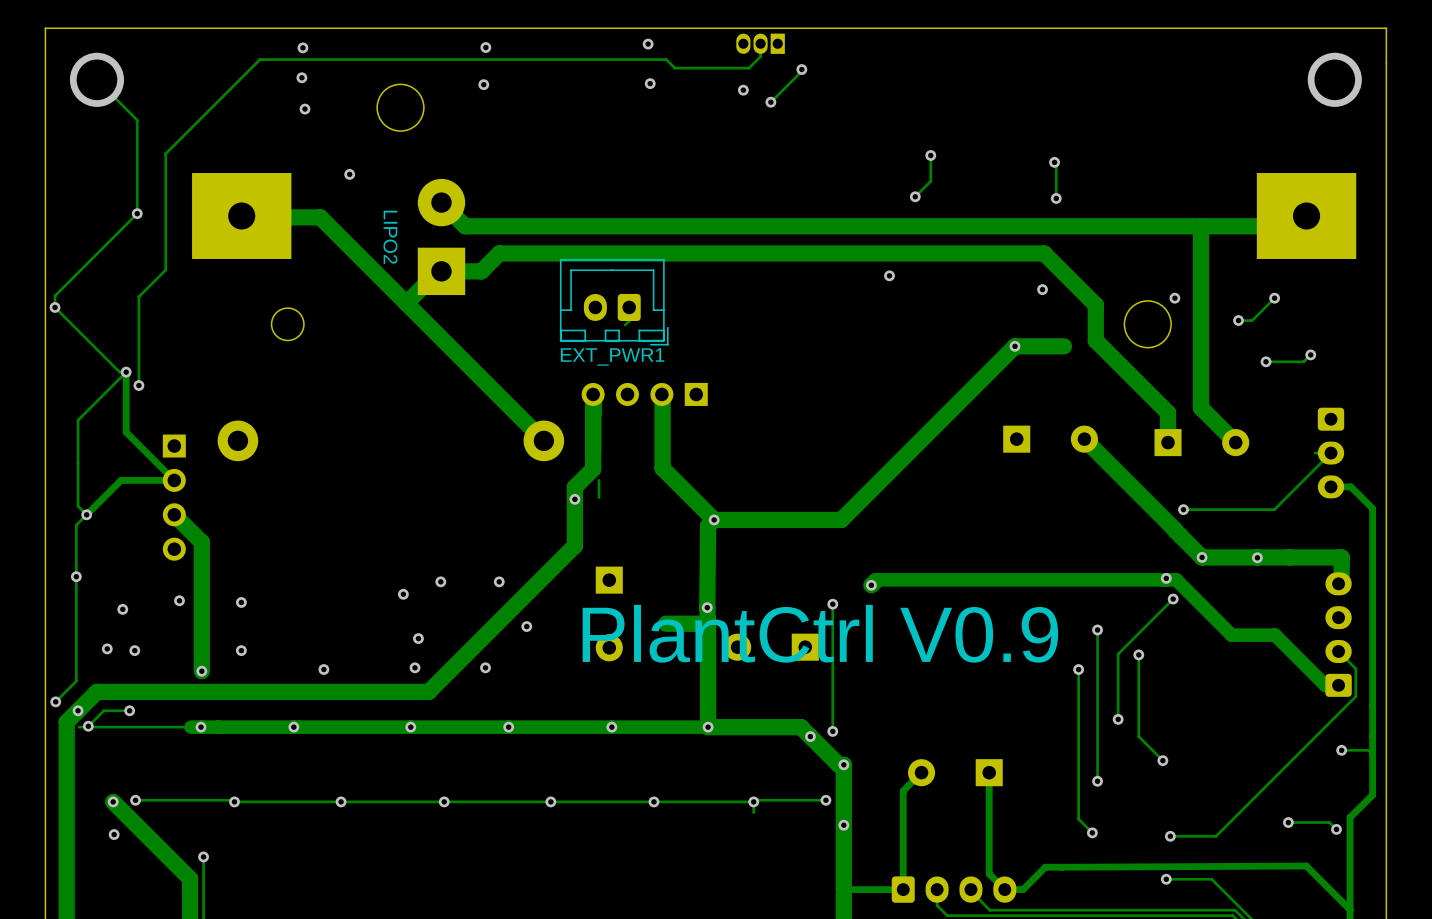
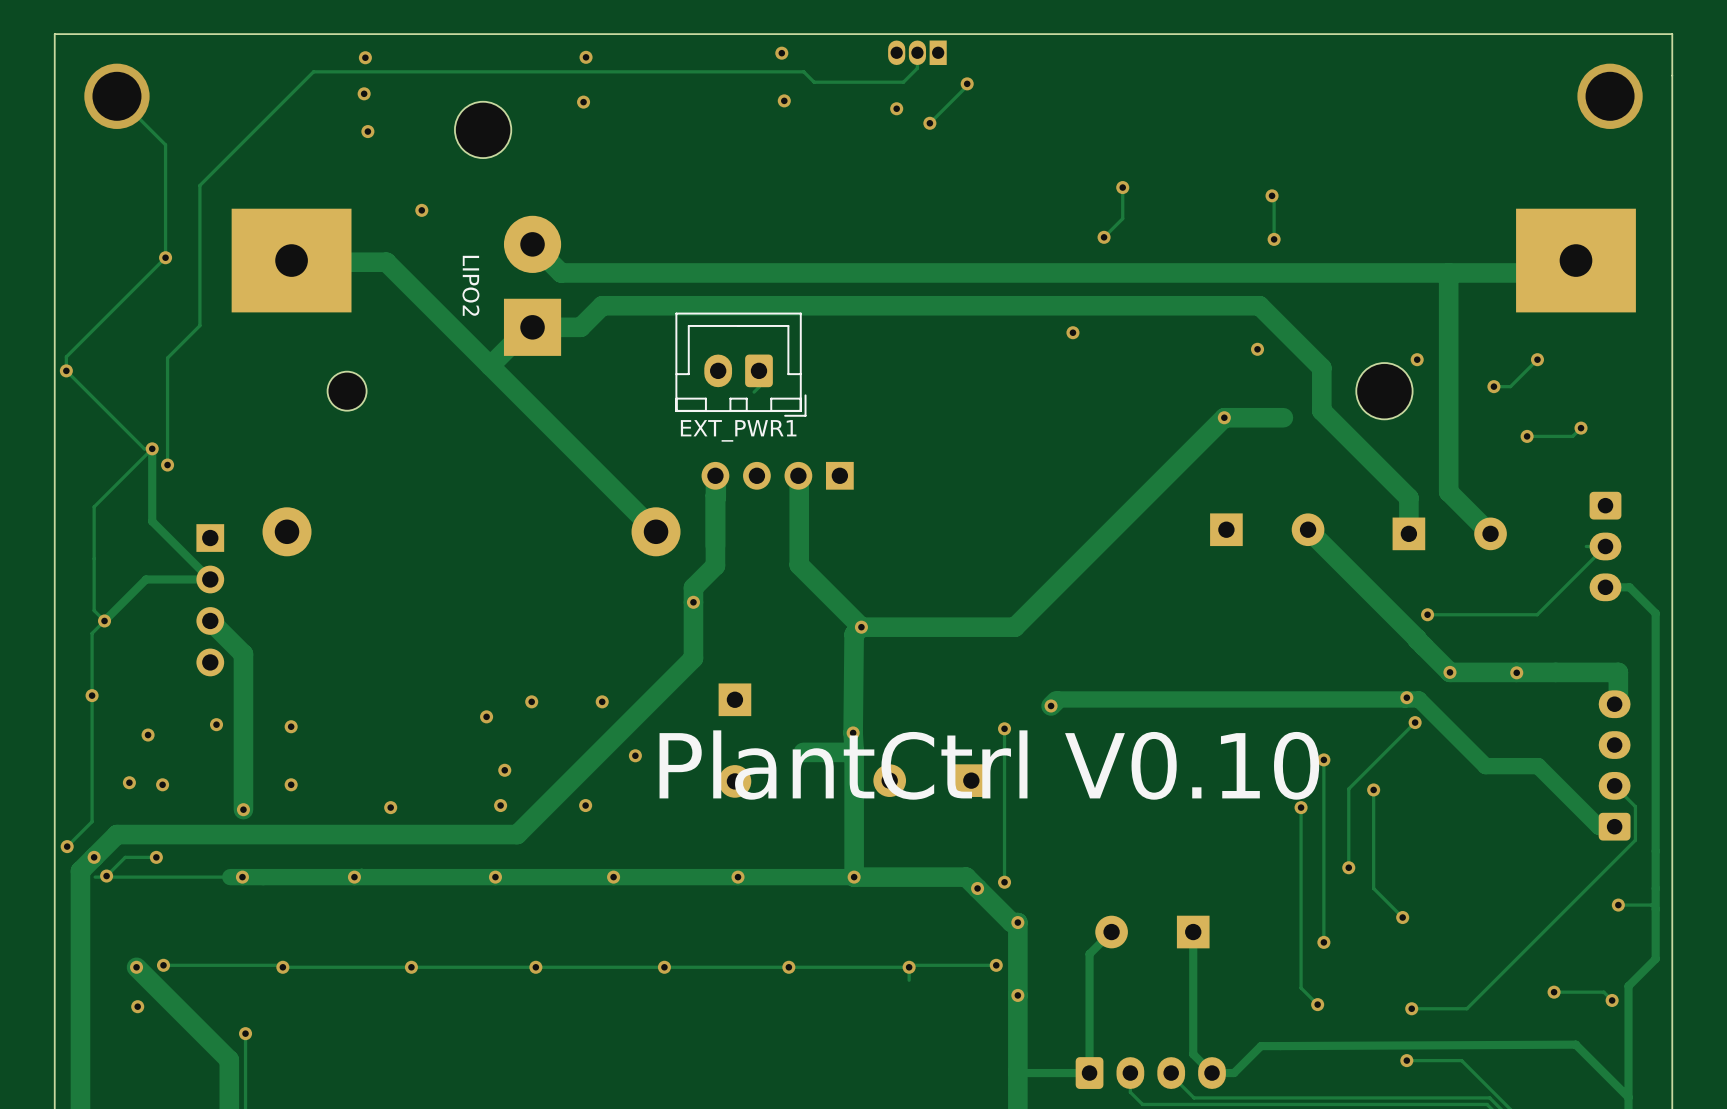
track: (599, 480) (599, 497) -> none
text: PlantCtrl V0.9 (820, 633) -> PlantCtrl V0.10 (989, 765)

